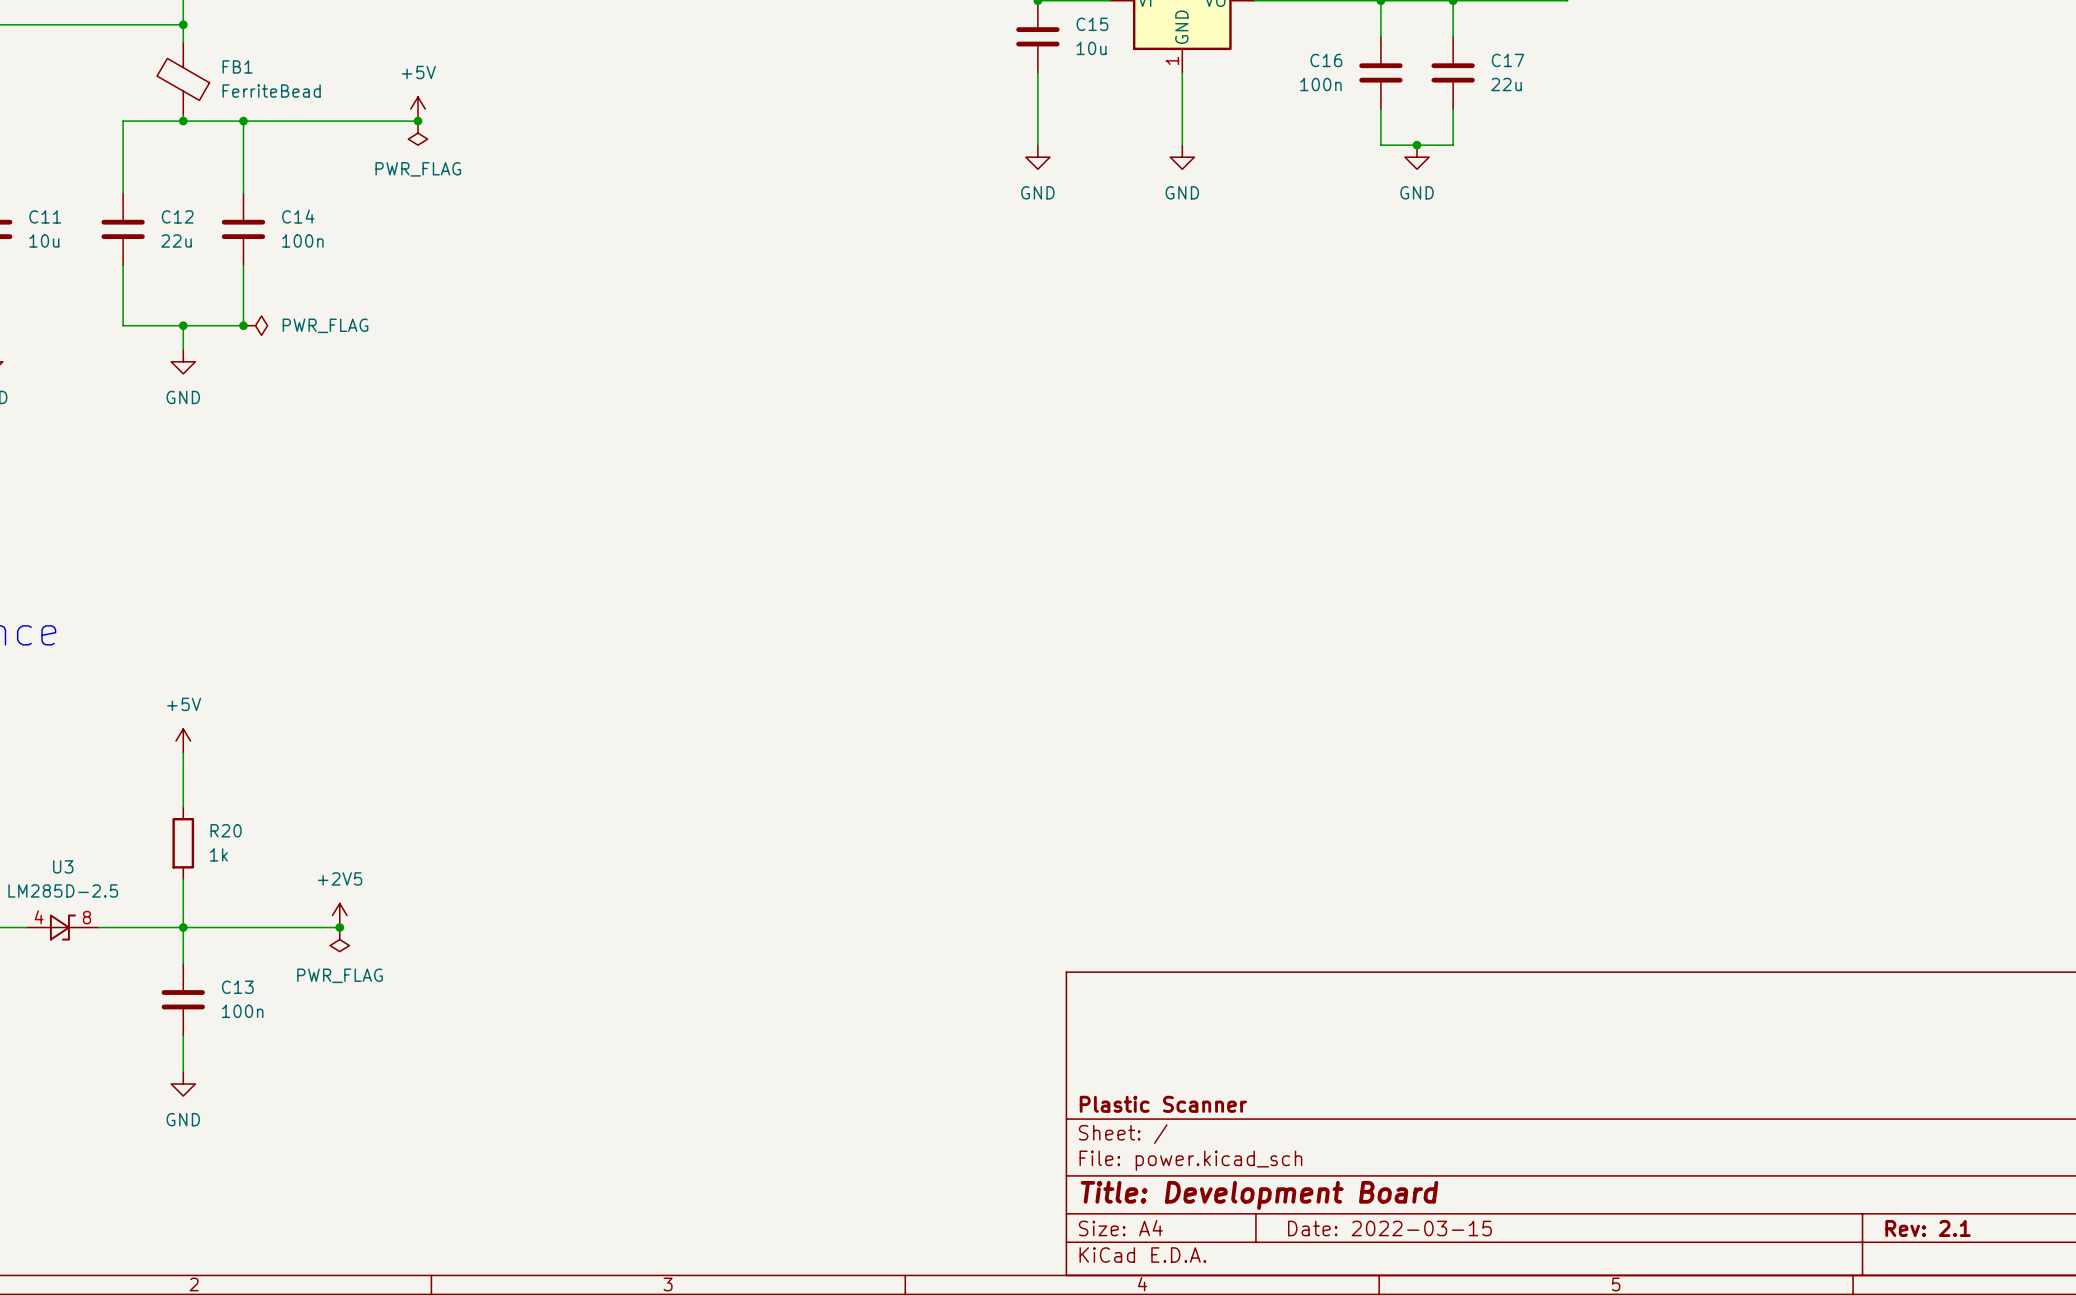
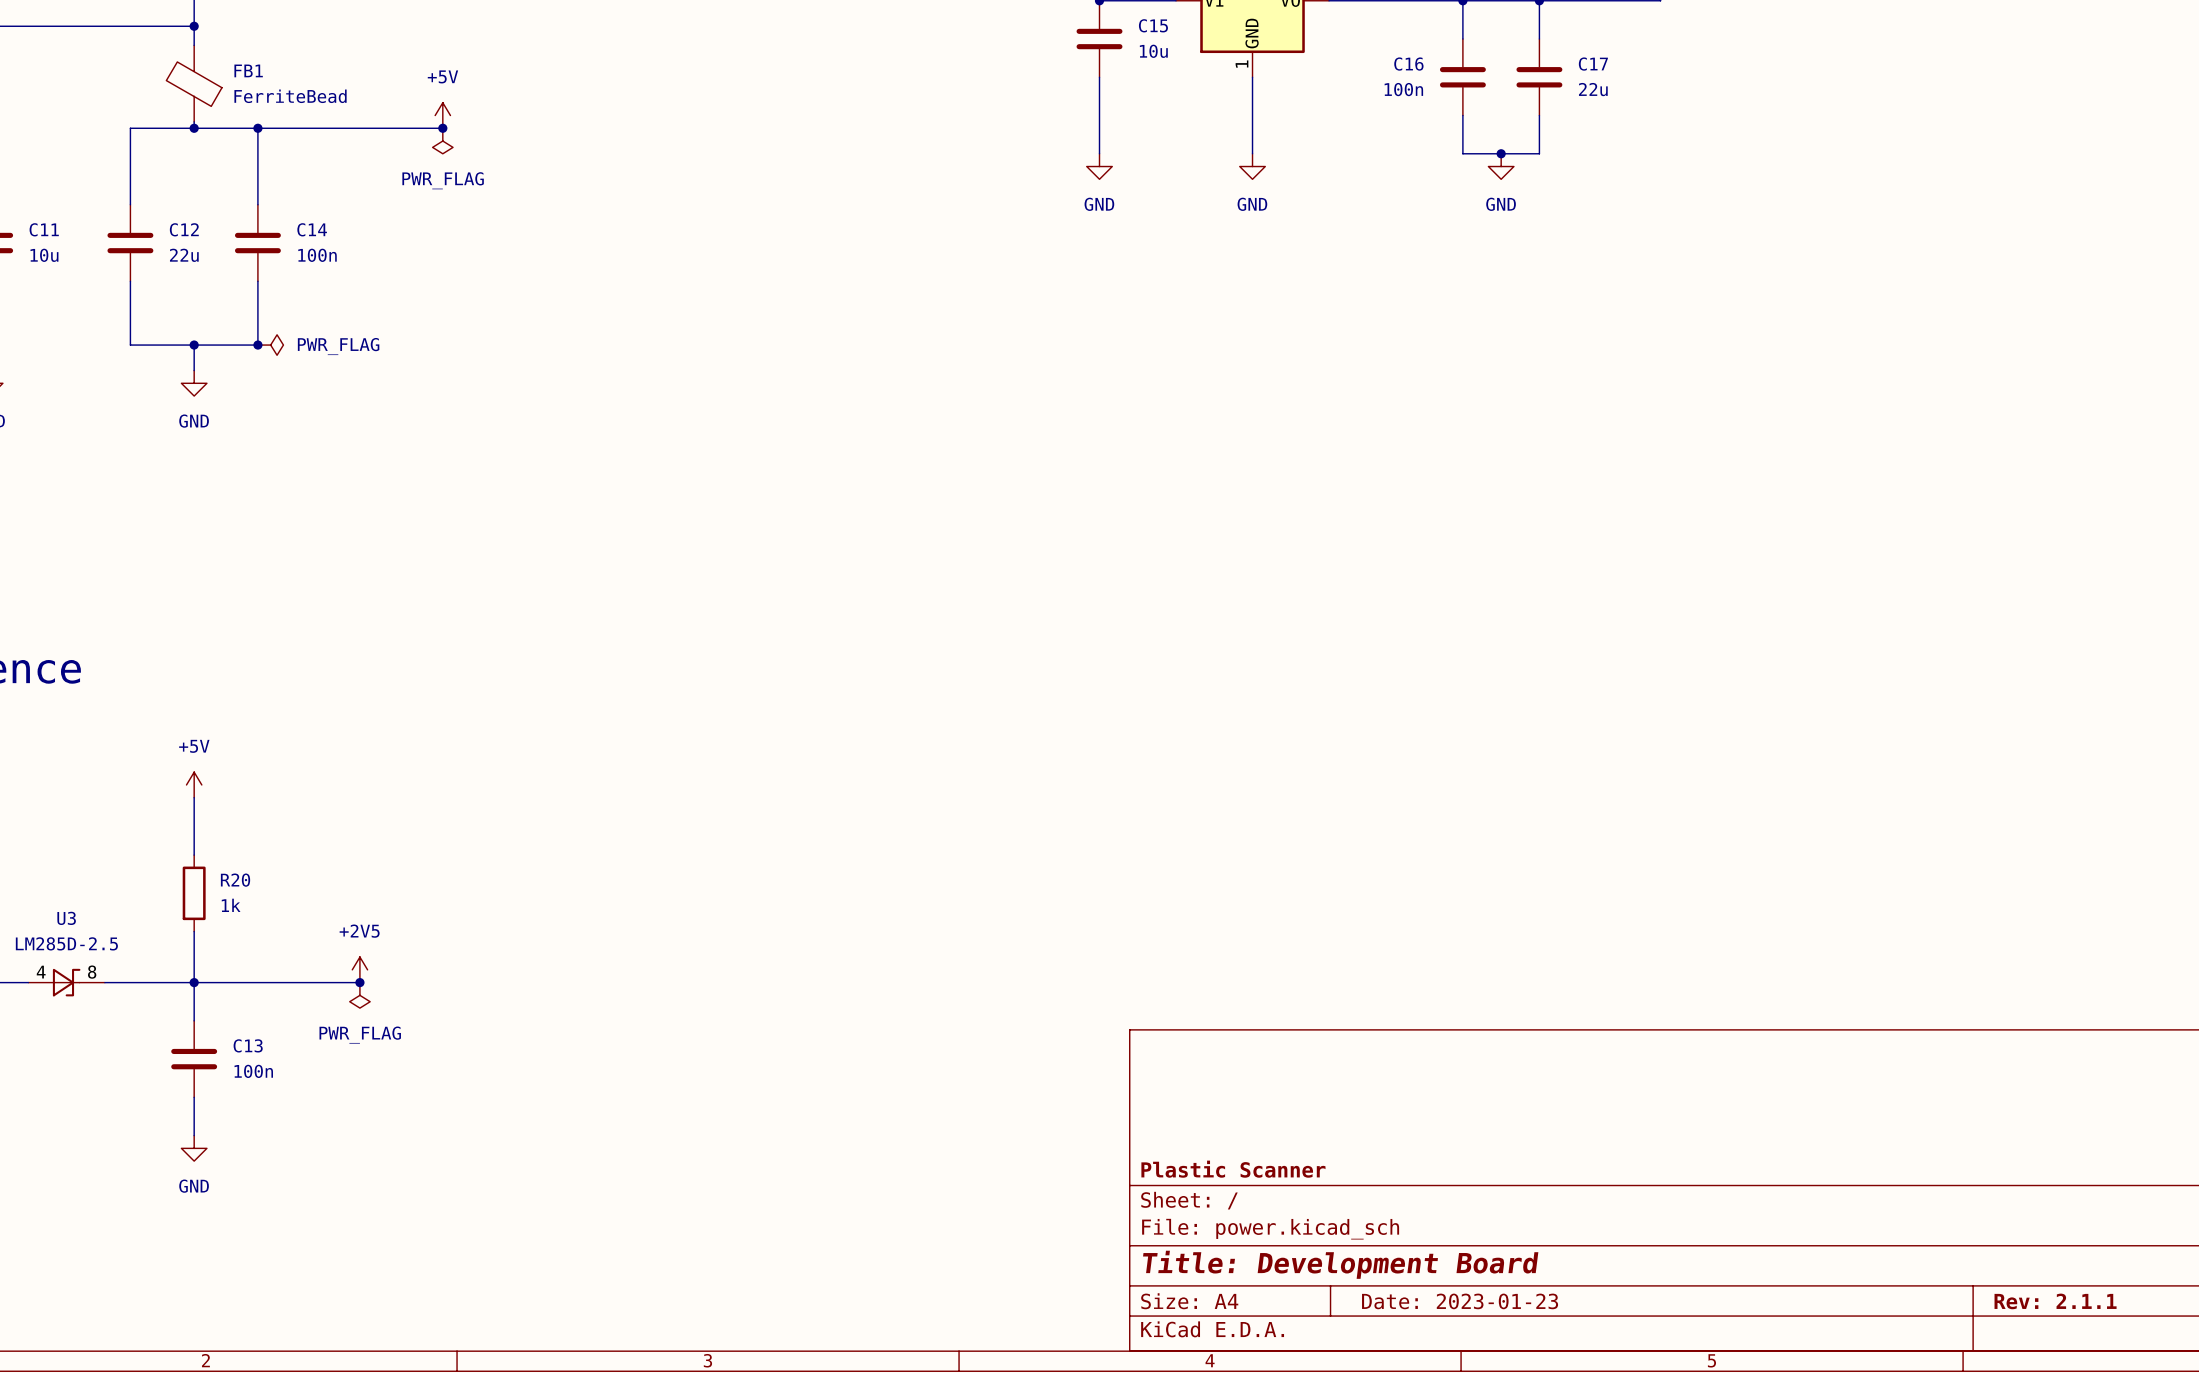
title block: Date: 2022-03-15 (1389, 1228) -> Date: 2023-01-23 (1460, 1301)
title block: Rev: 2.1 (1928, 1228) -> Rev: 2.1.1 (2055, 1301)

